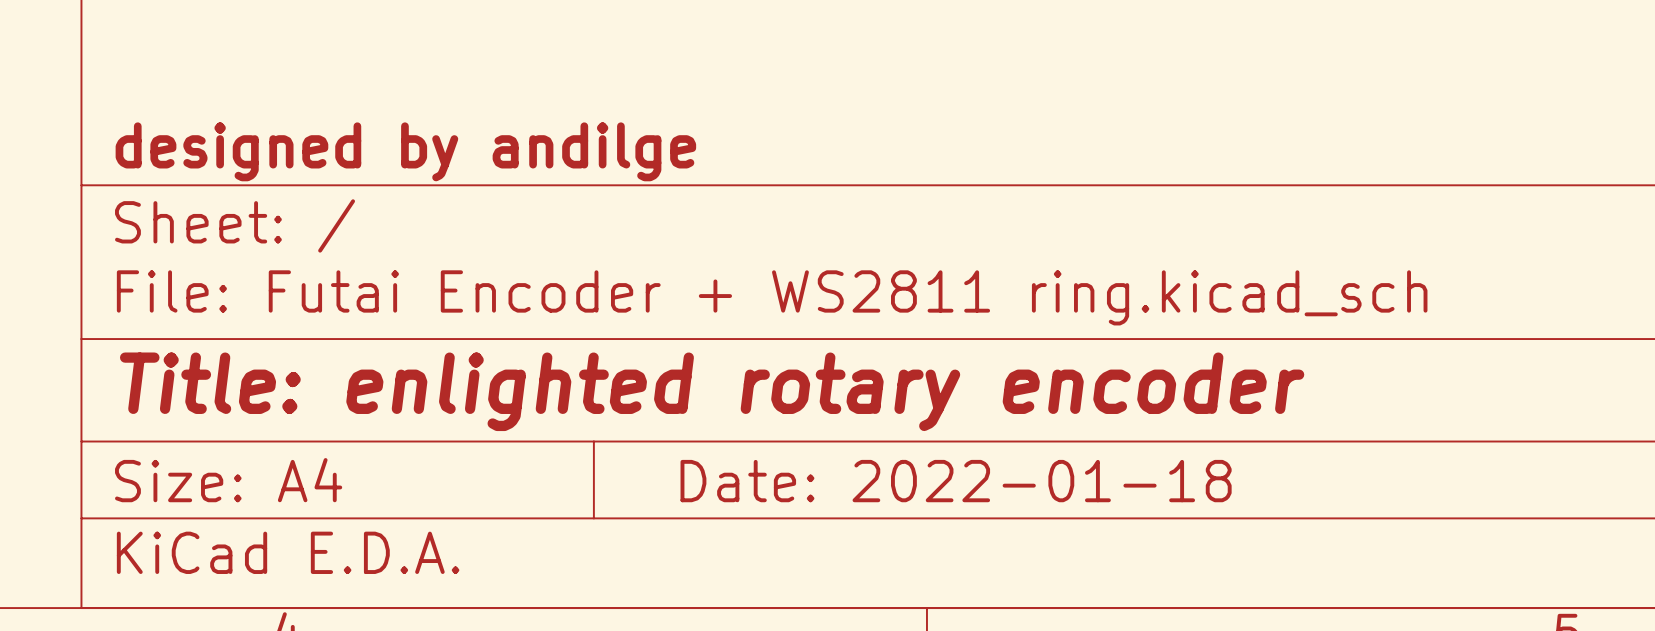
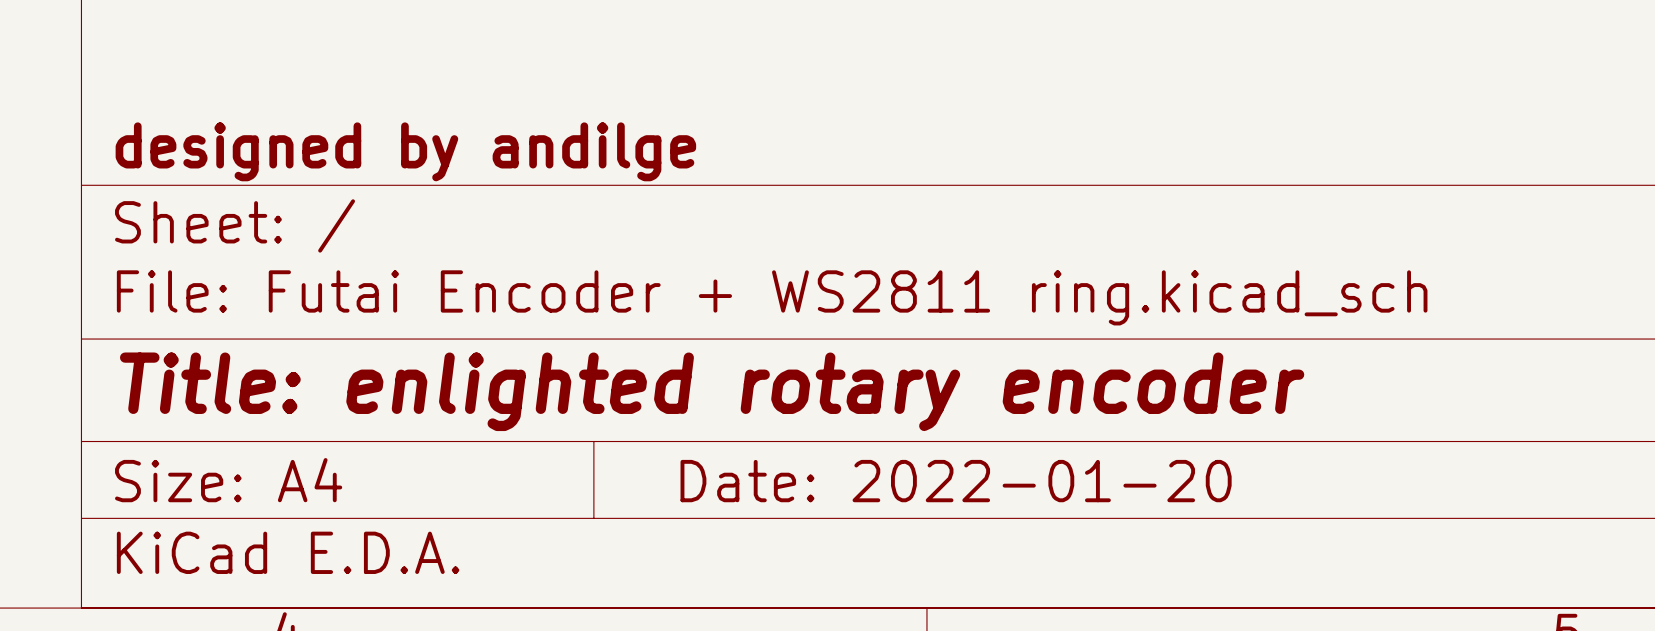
title block: Date: 2022-01-18 (956, 481) -> Date: 2022-01-20 (956, 481)

